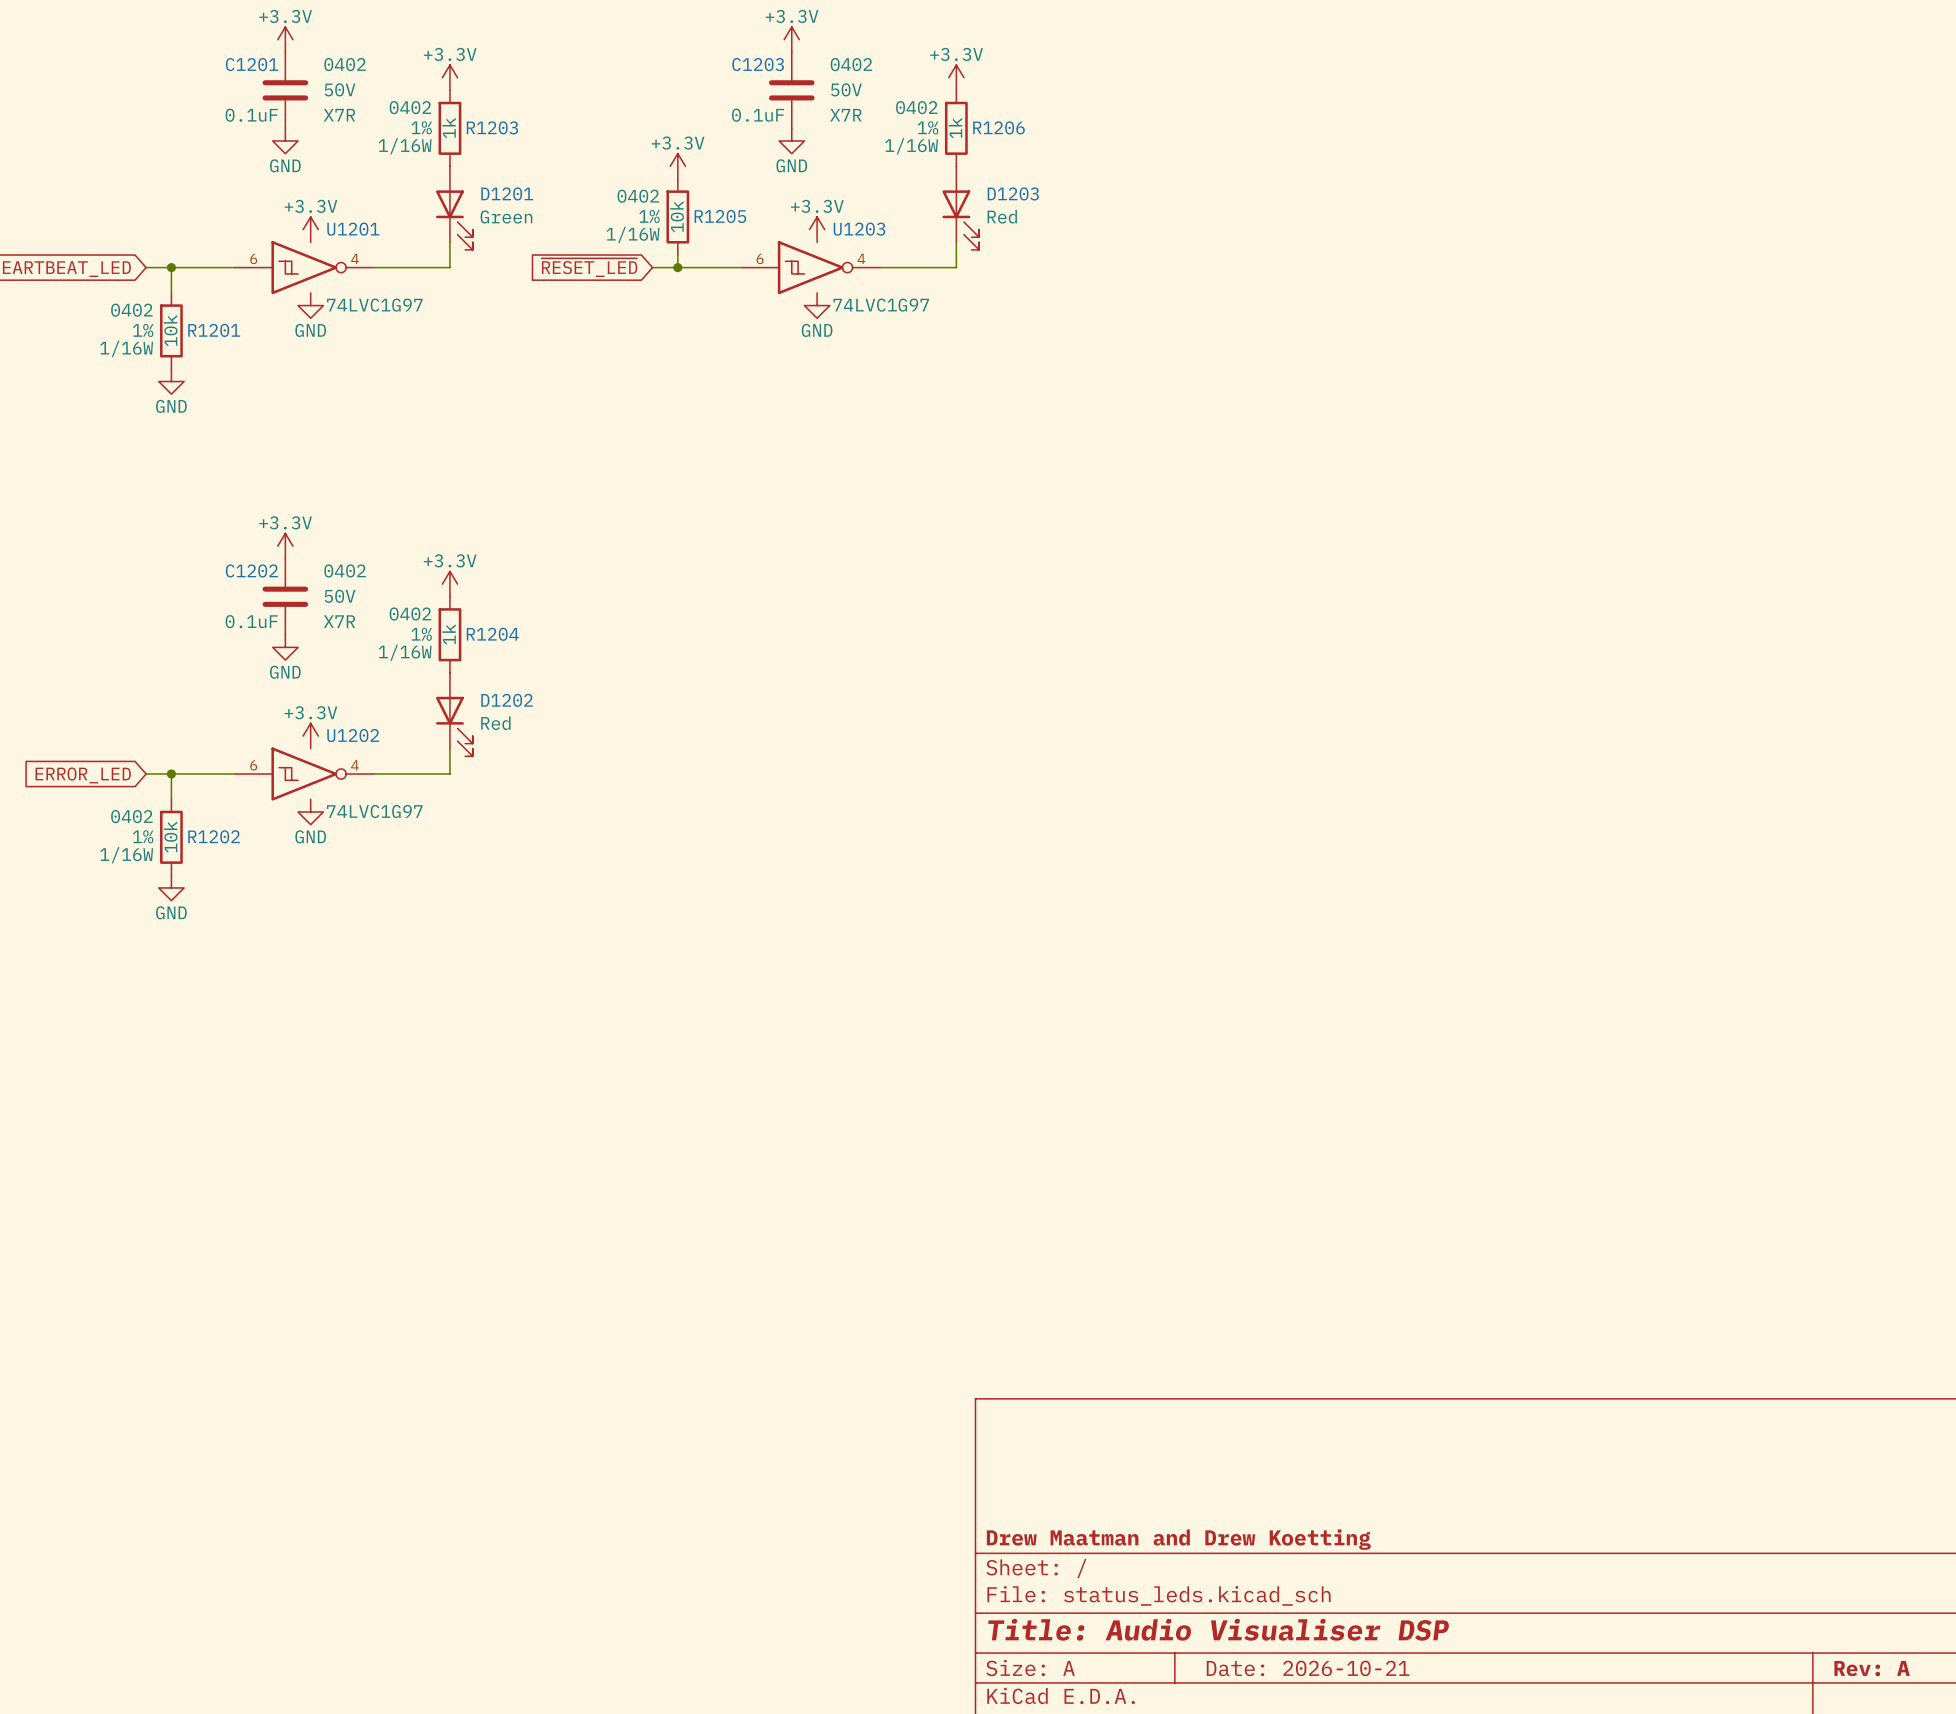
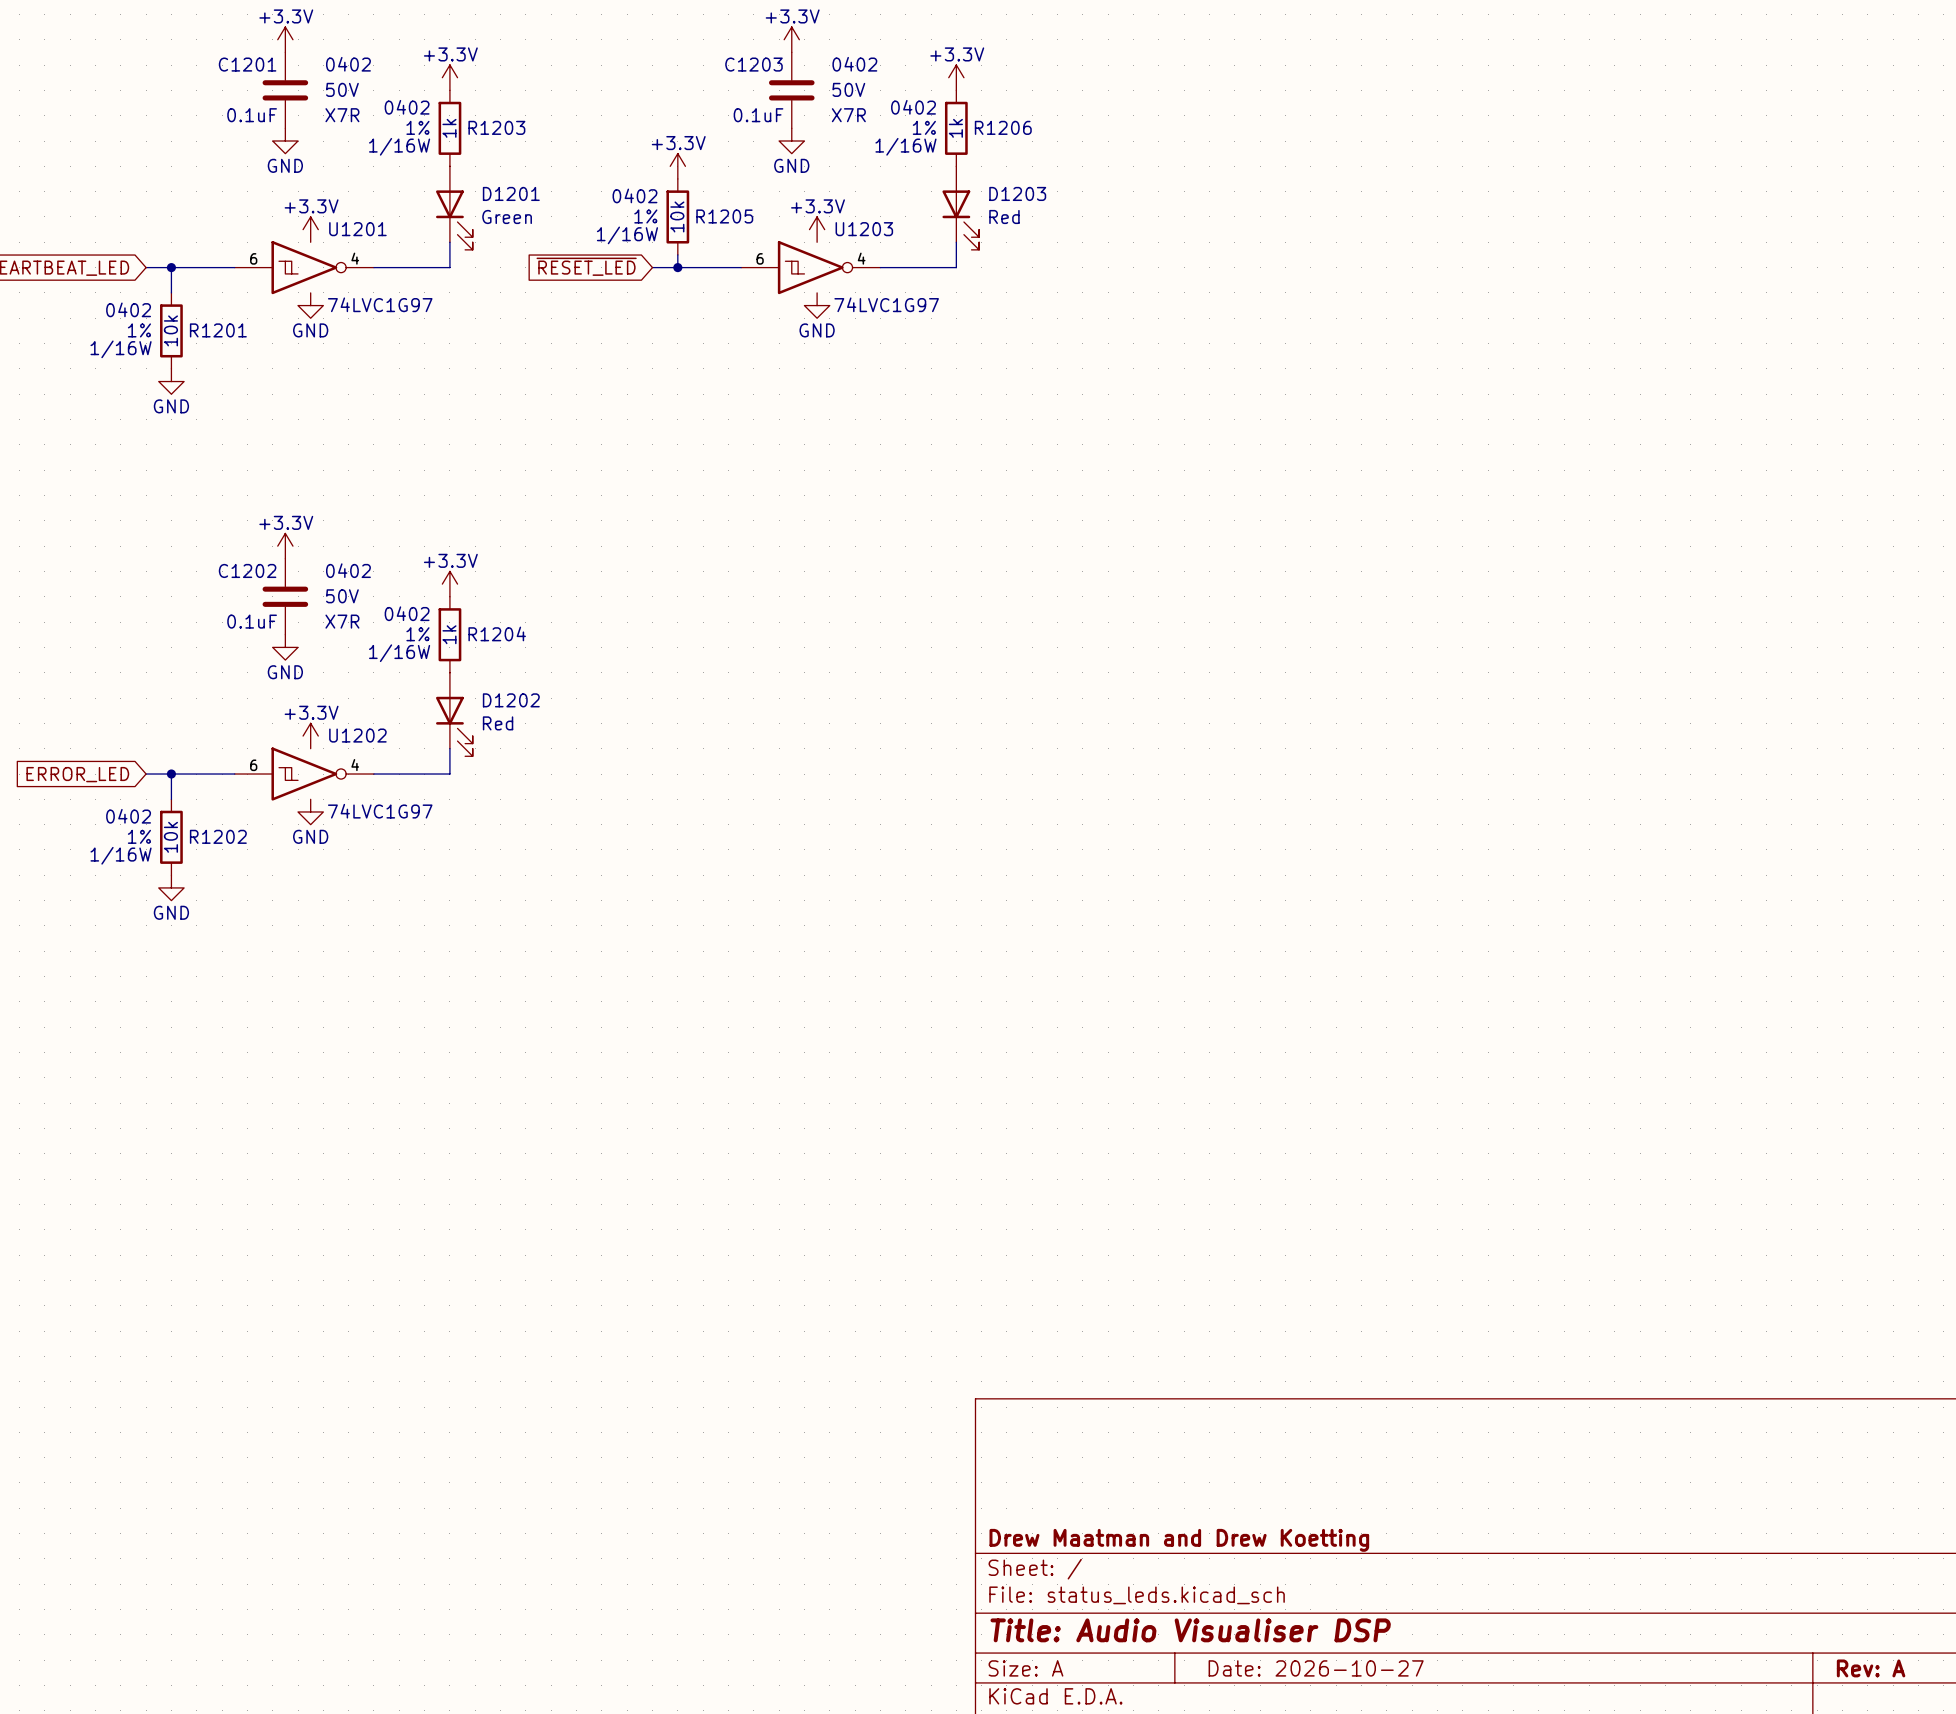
title block: Date: 2026-10-21 (1308, 1668) -> Date: 2026-10-27 (1316, 1668)

